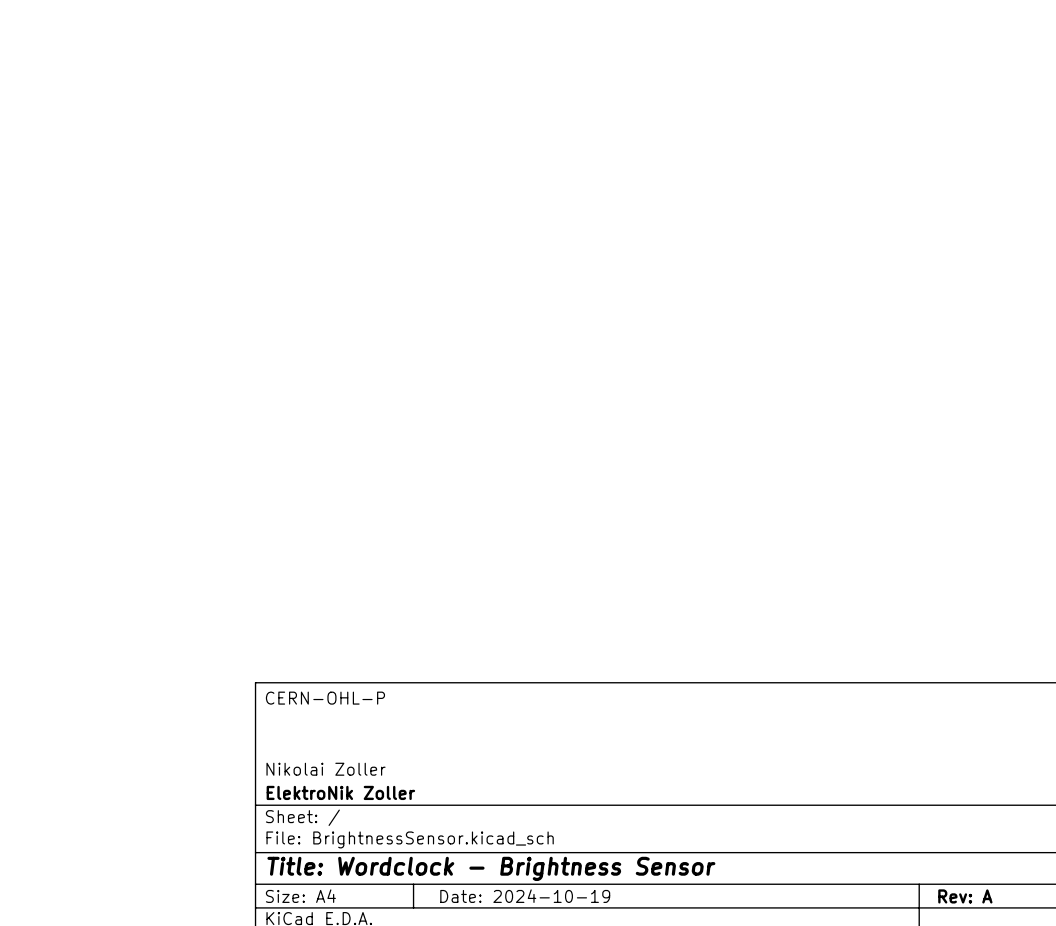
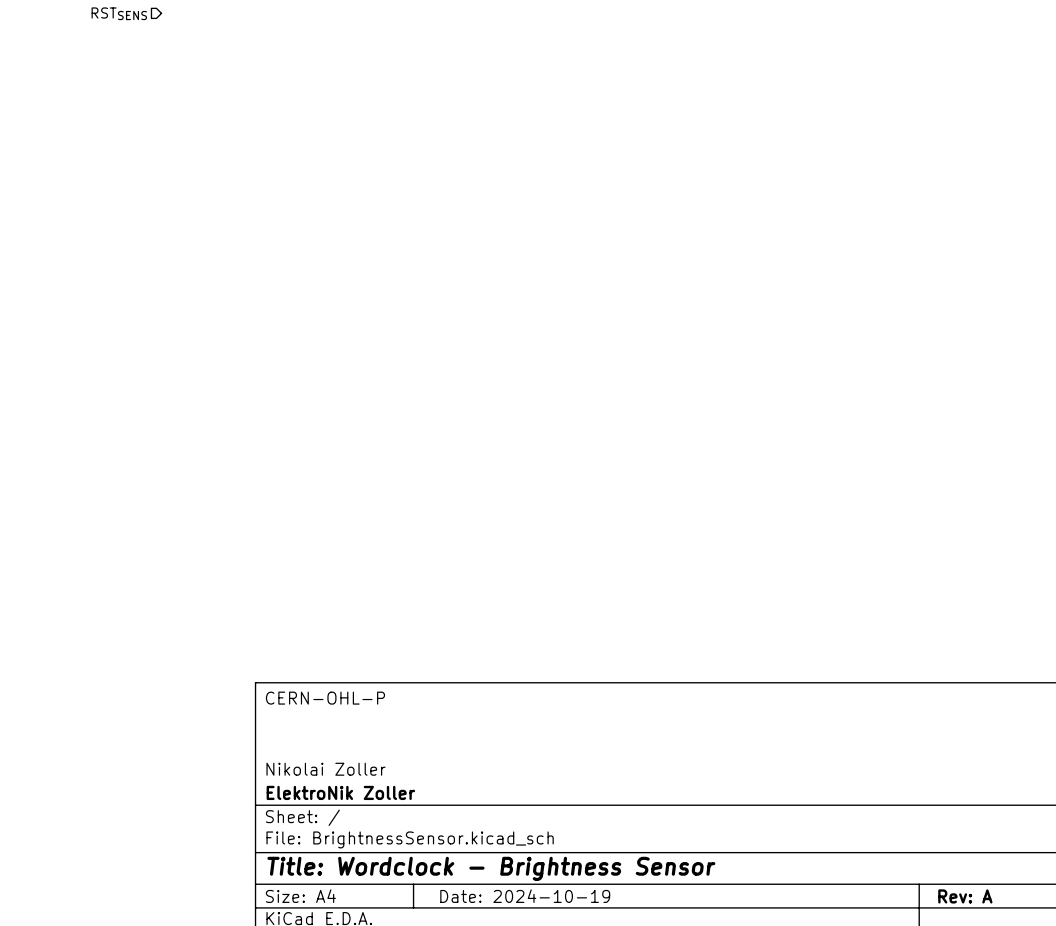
hierarchical label: none -> RSTSENS (119, 13)

